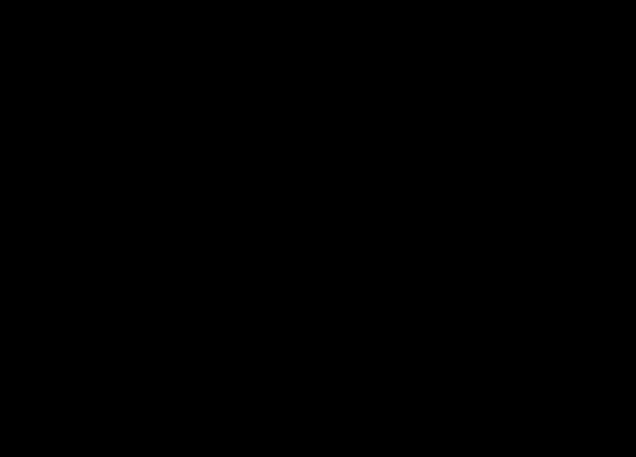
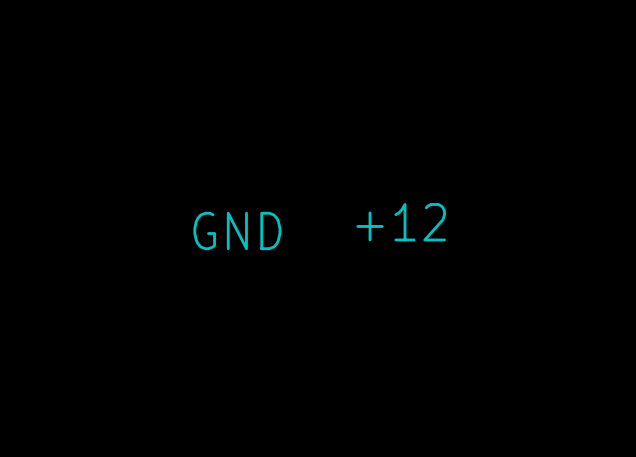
text: none -> +12 (401, 222)
text: none -> GND (237, 230)

